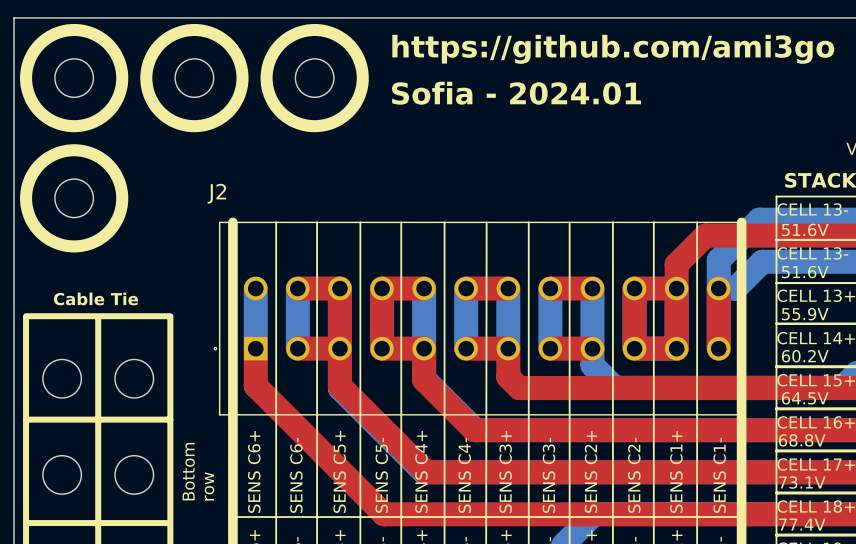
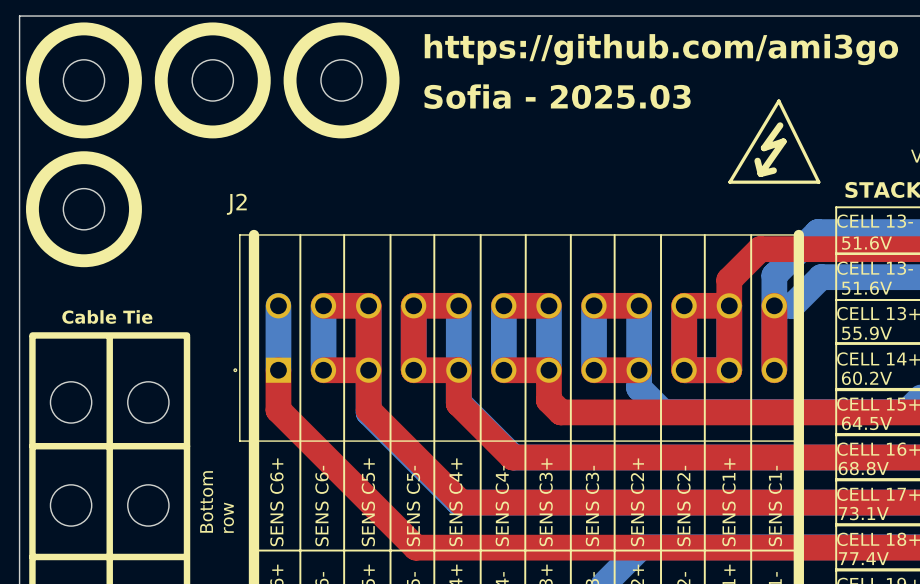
text: Sofia - 2024.01 (516, 93) -> Sofia - 2025.03 (557, 96)
line: none -> (778, 101) (818, 182) (729, 182) (778, 101)
line: none -> (780, 125) (764, 148) (783, 141) (760, 173)
line: none -> (757, 160) (760, 173)
line: none -> (773, 170) (760, 173)

